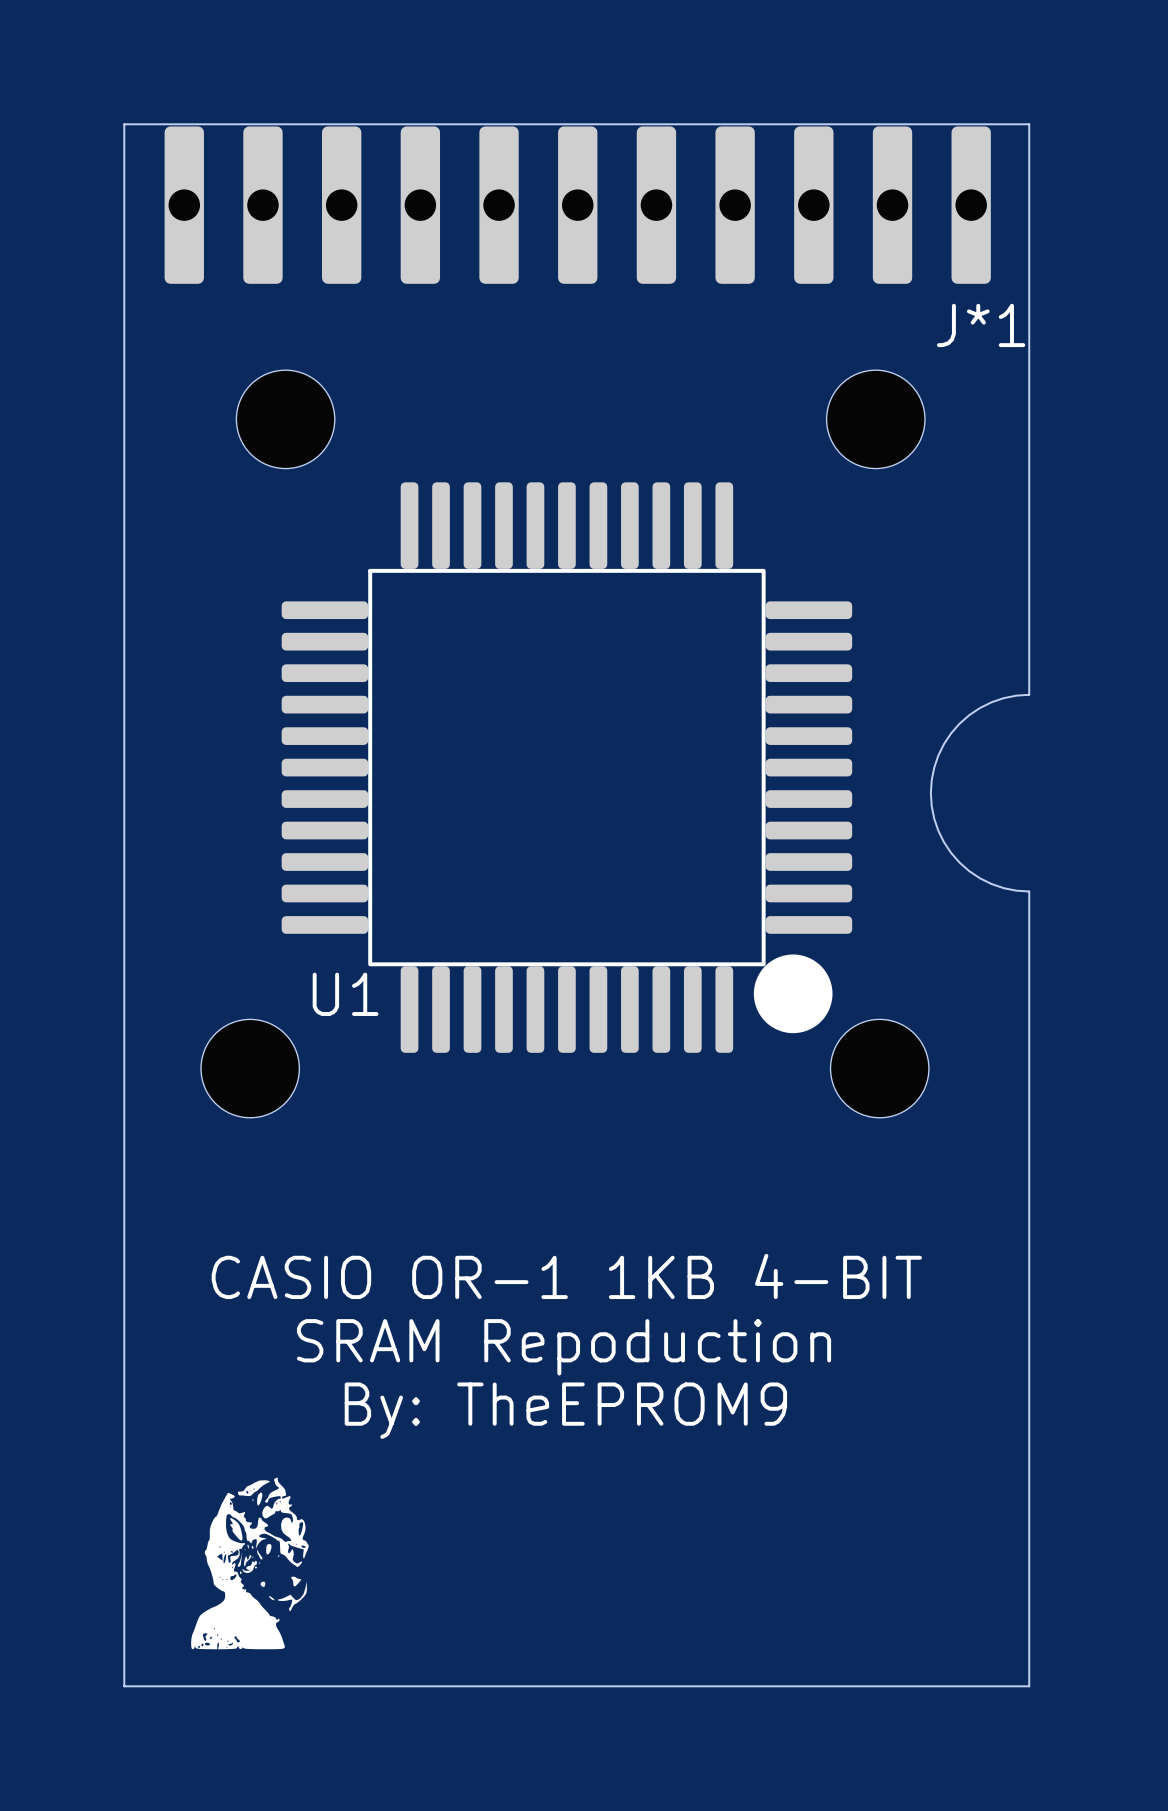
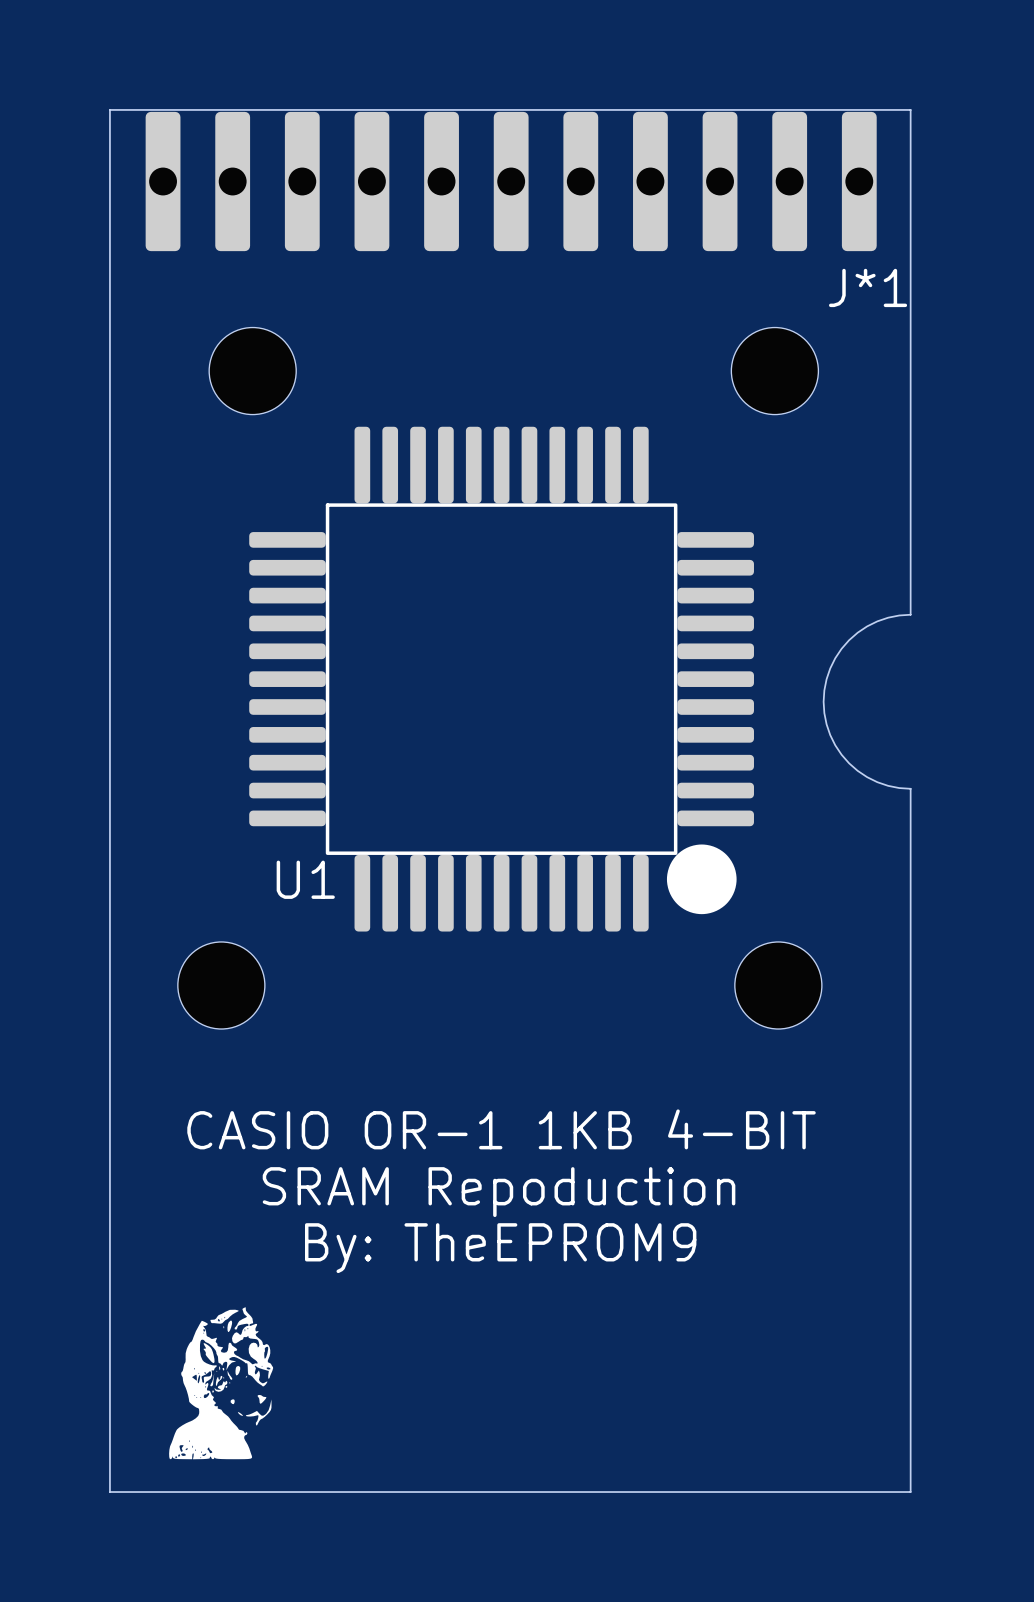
part position: (250, 1068) -> (221, 985)
part position: (879, 1068) -> (778, 985)

